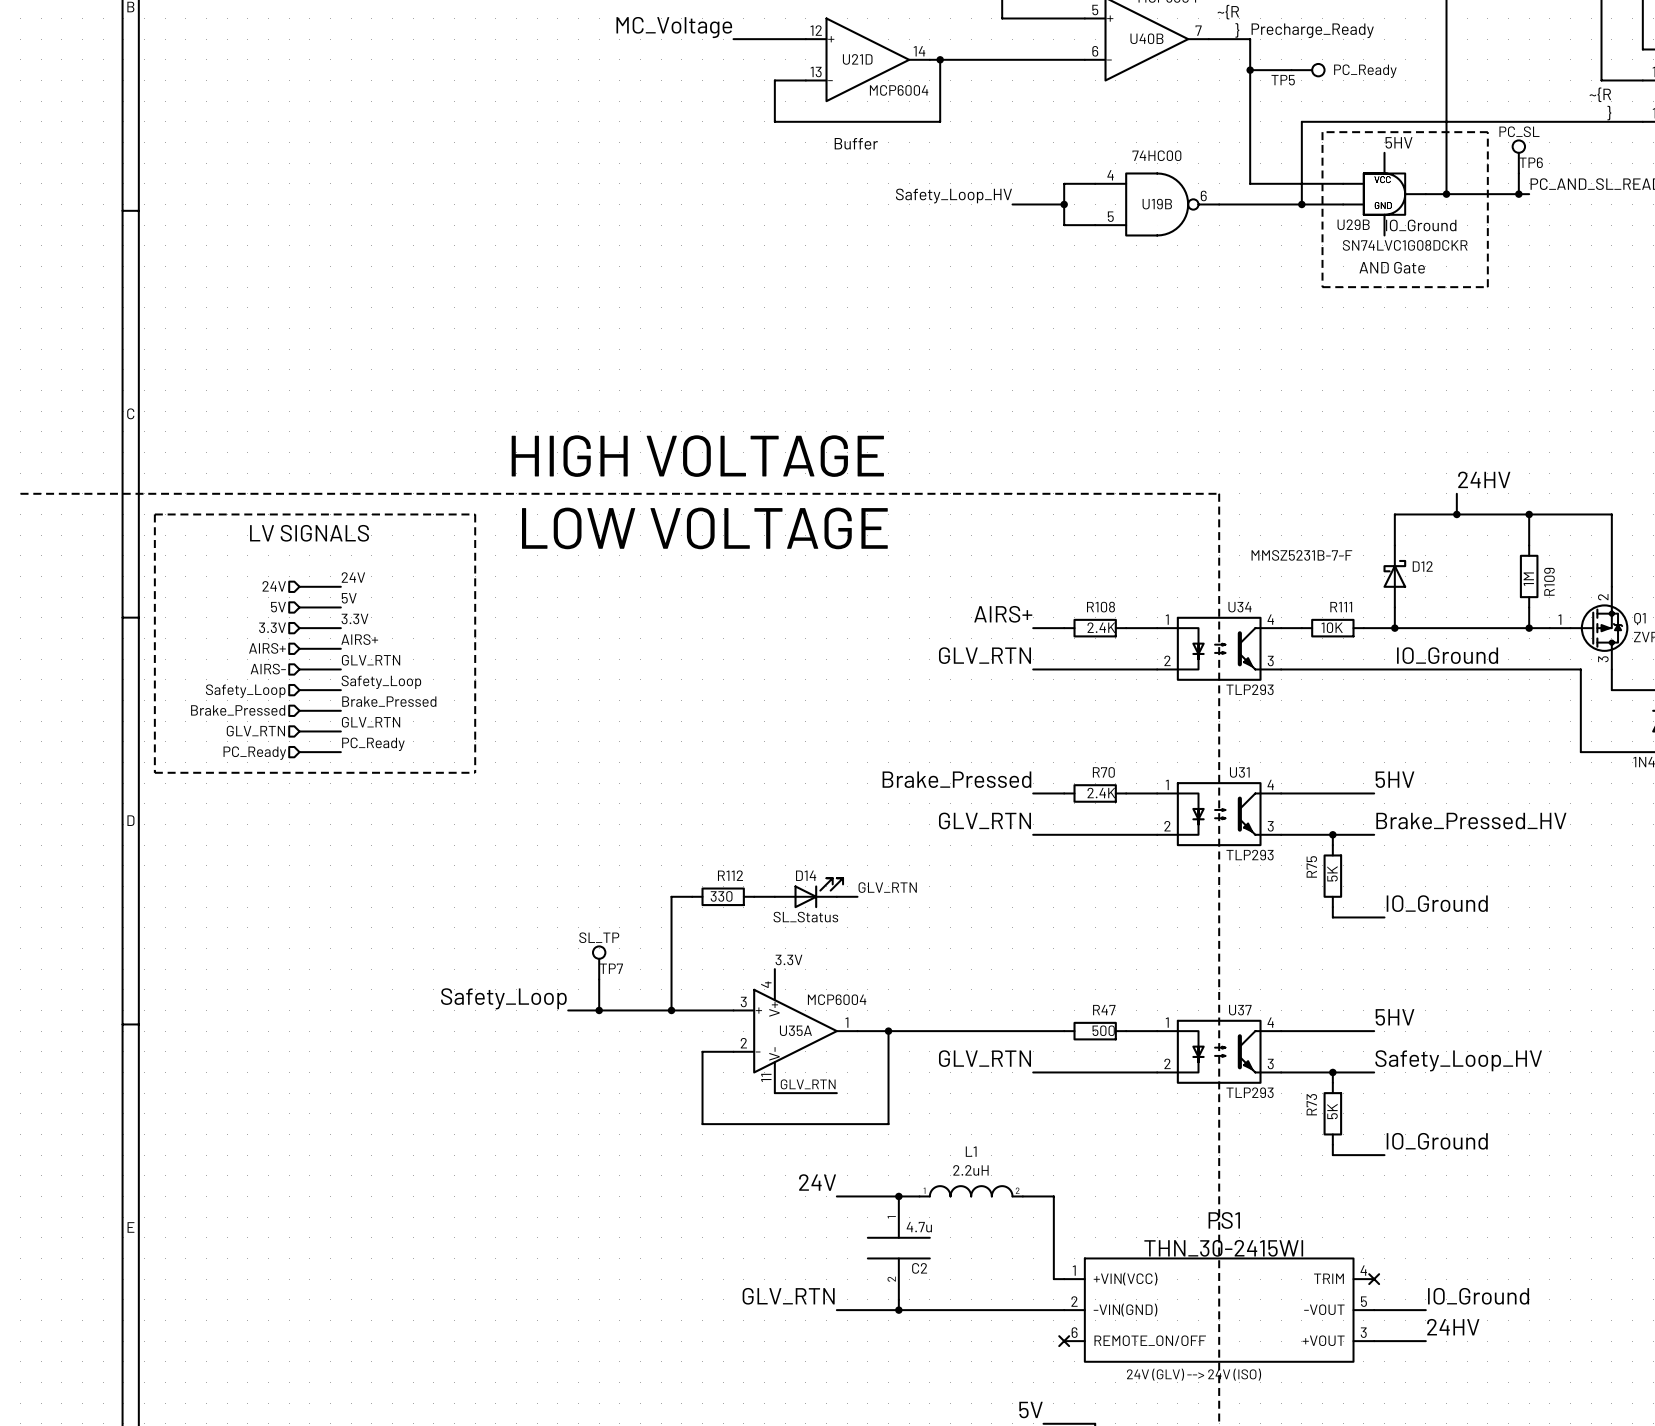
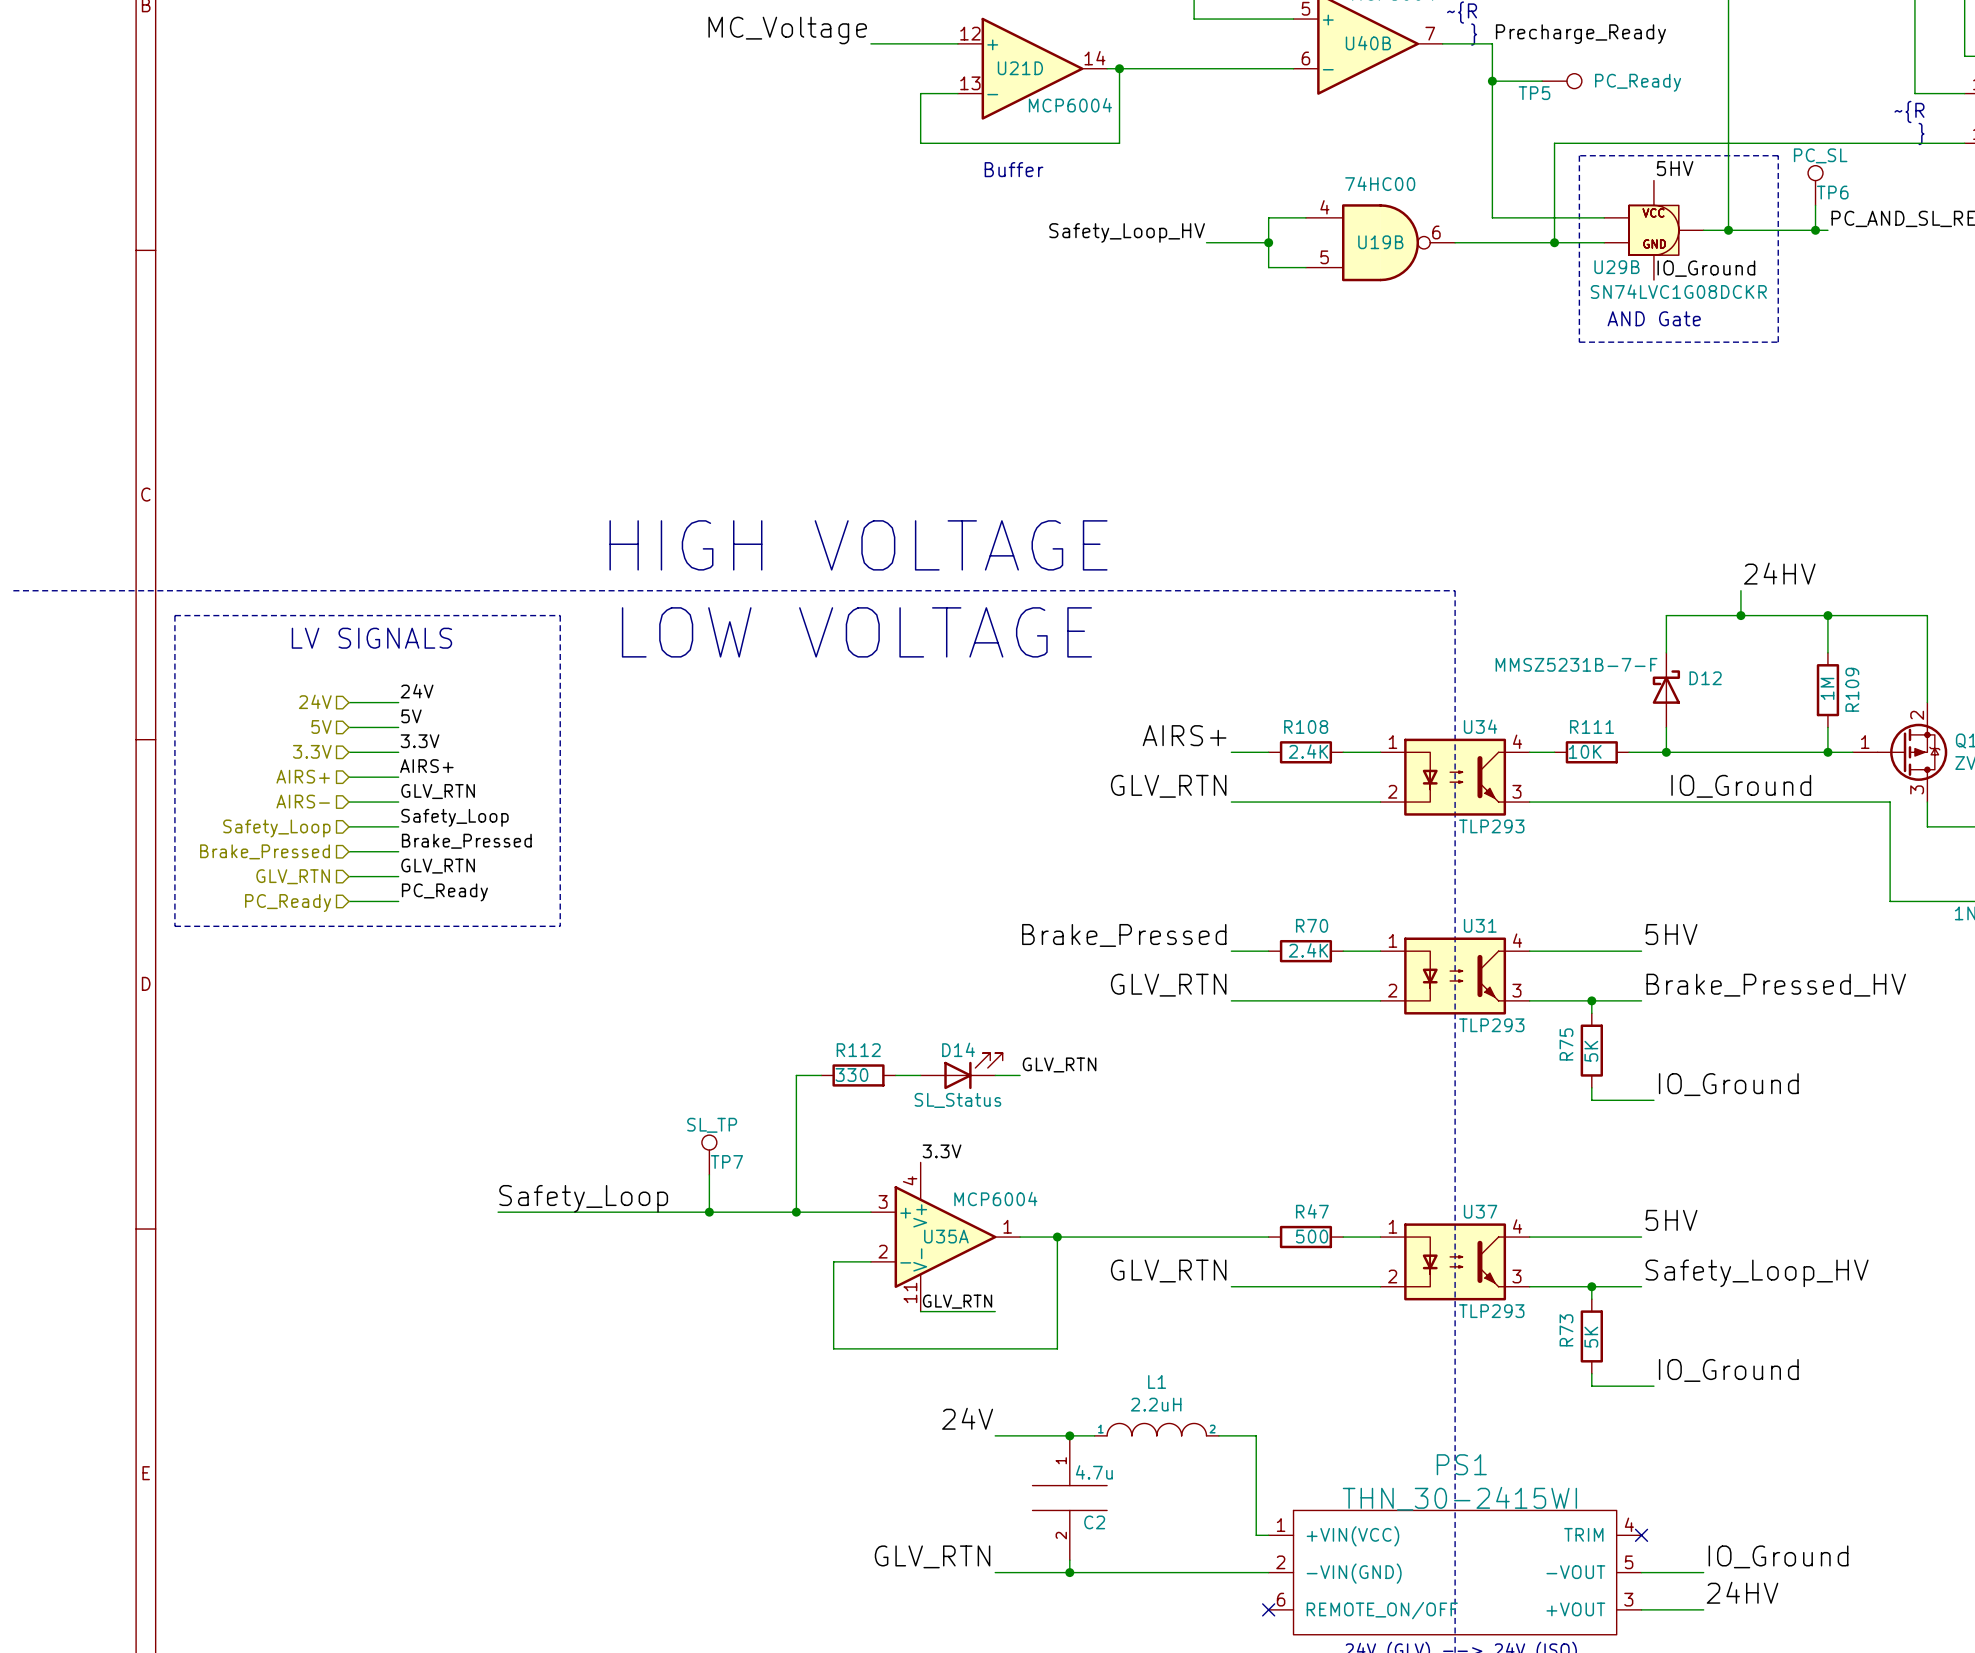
wire: none -> (498, 1212) (672, 1212)

